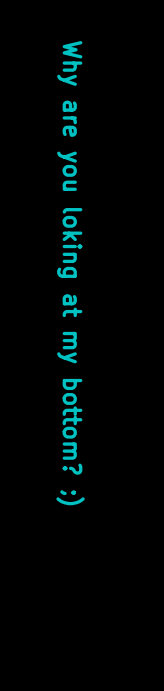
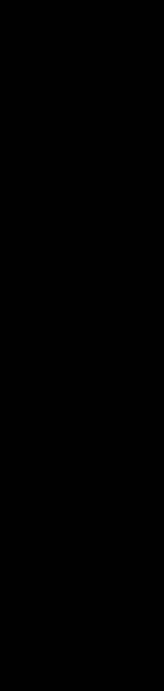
text: Why are you loking at my bottom? ;) (70, 273) -> none

